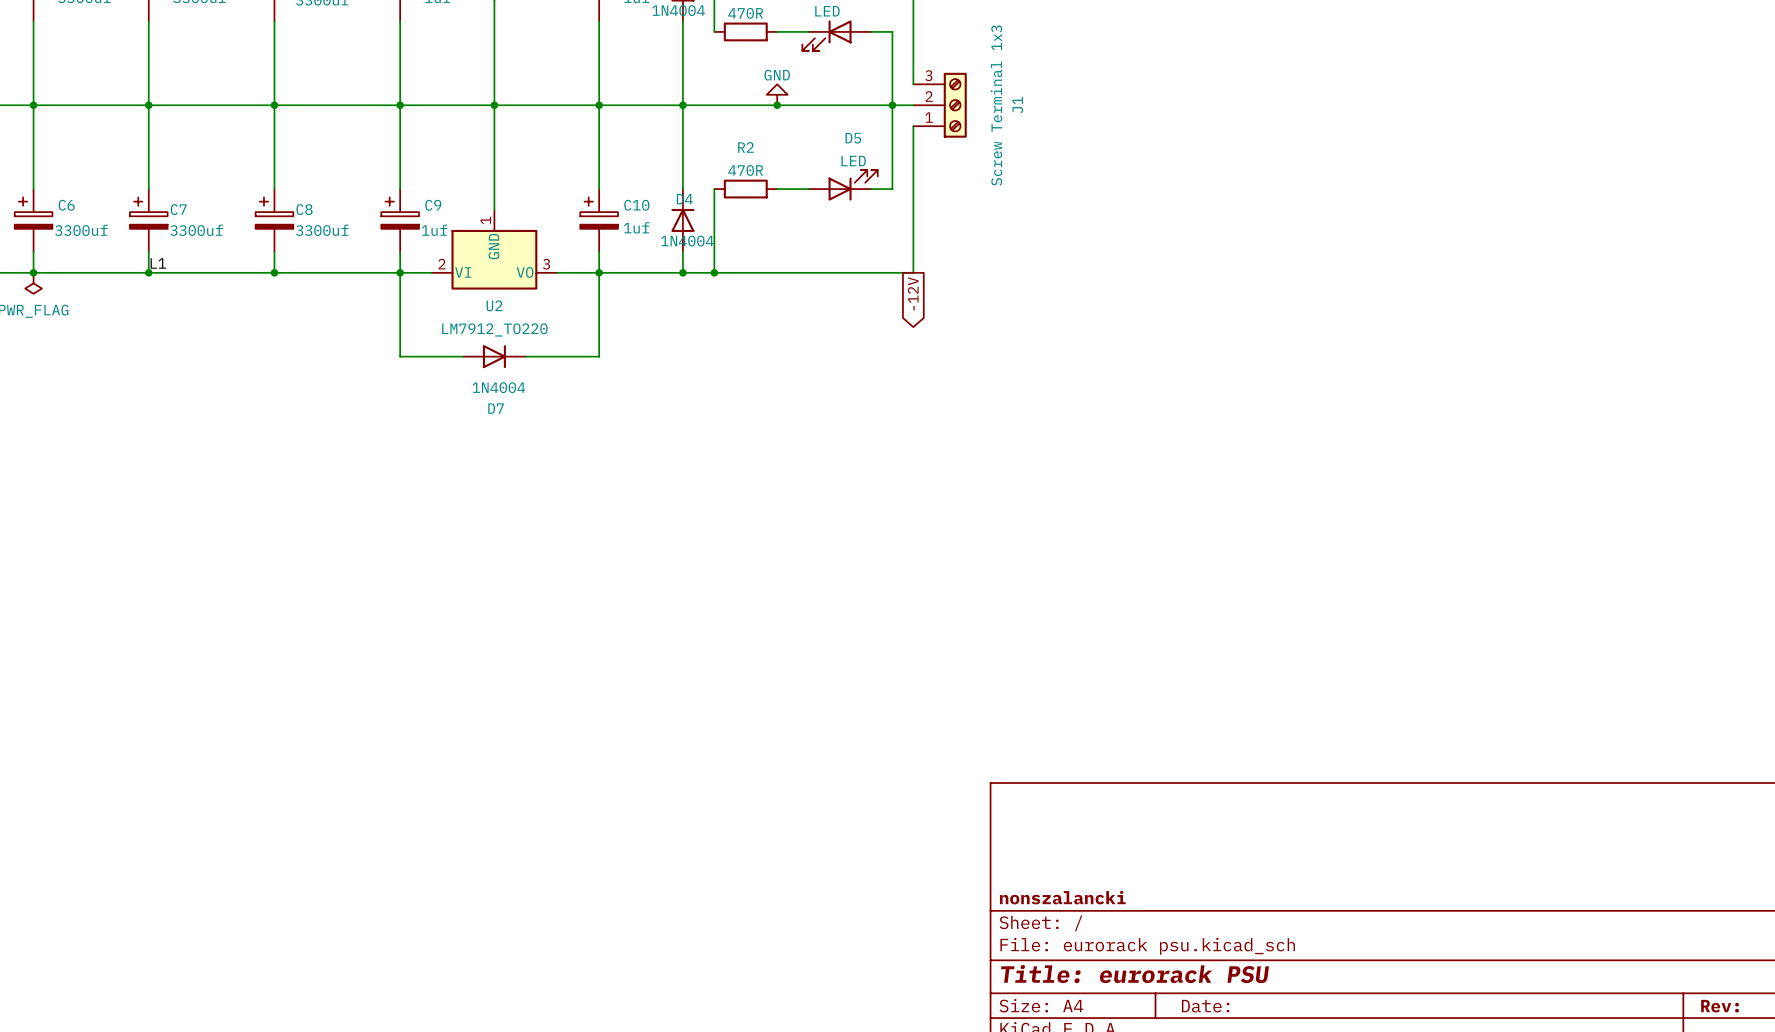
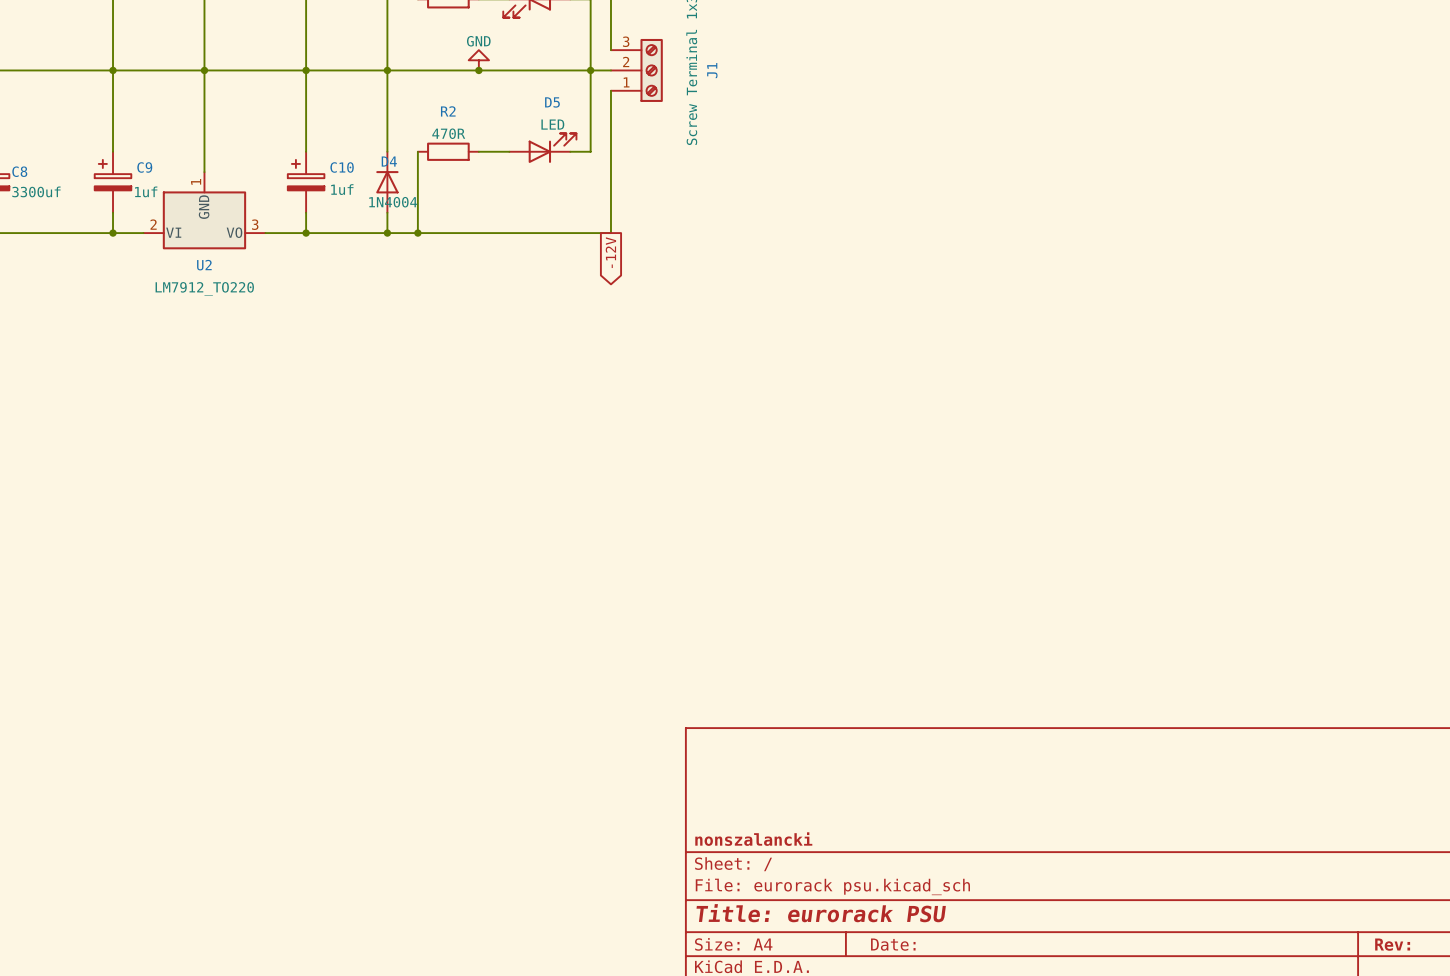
wire: (400, 272) (400, 356) (462, 356) -> none
wire: (599, 272) (599, 356) (525, 356) -> none
D7: 1N4004 (494, 356) -> none

